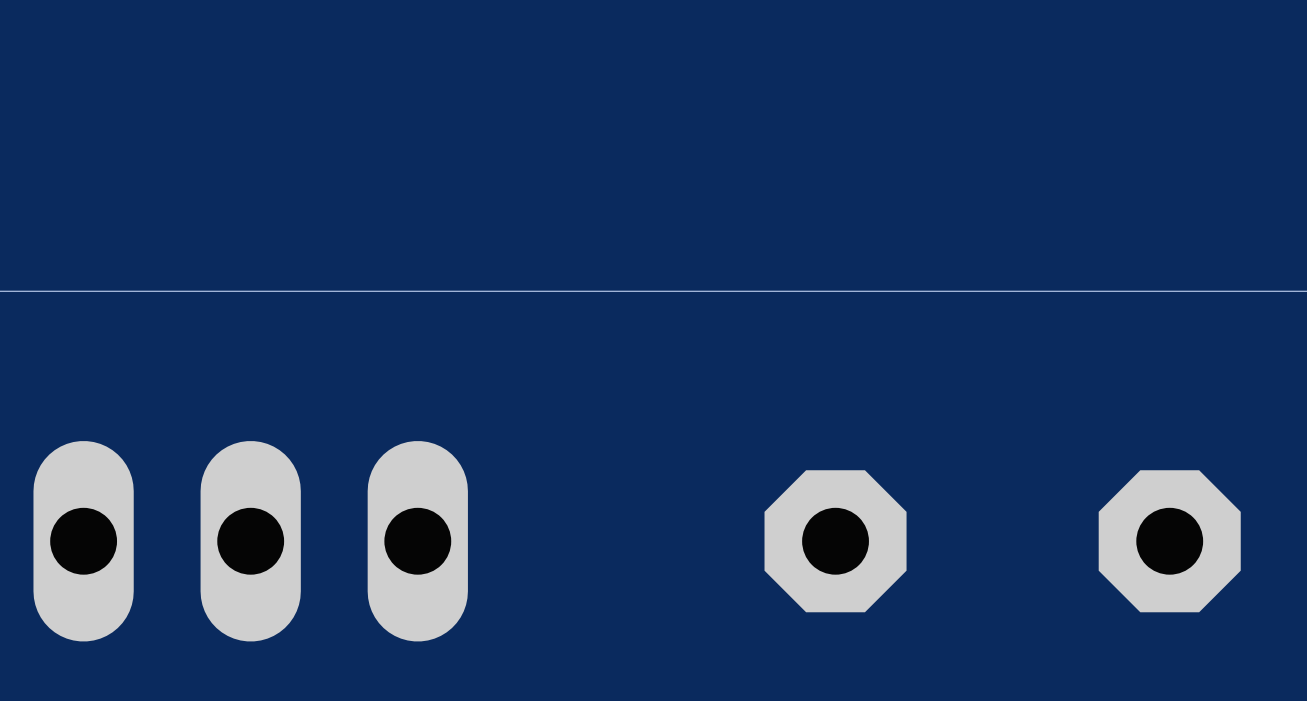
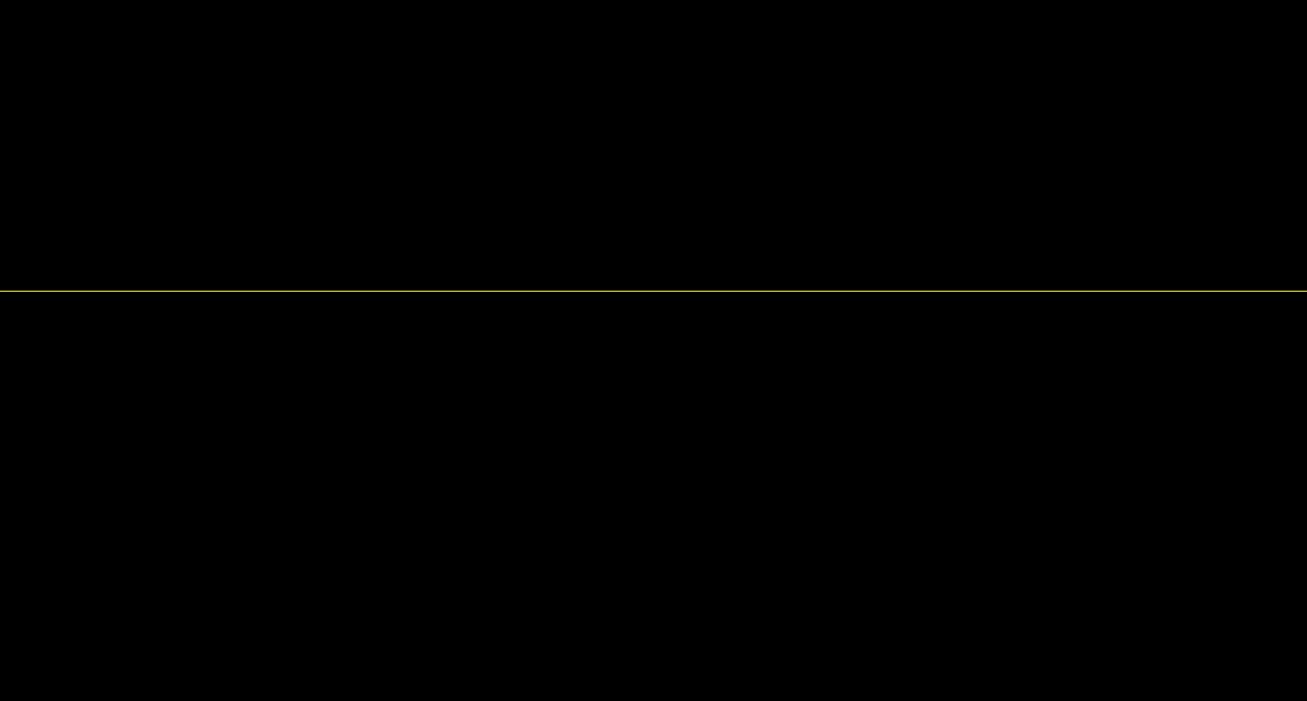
part: (250, 541) -> none
part: (835, 541) -> none
part: (1169, 541) -> none

